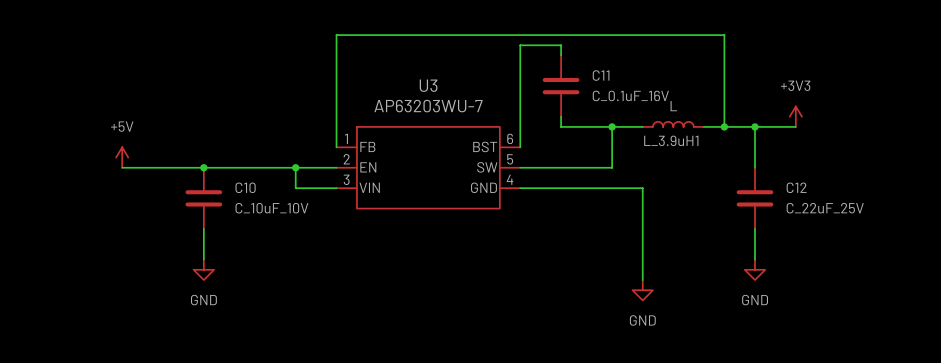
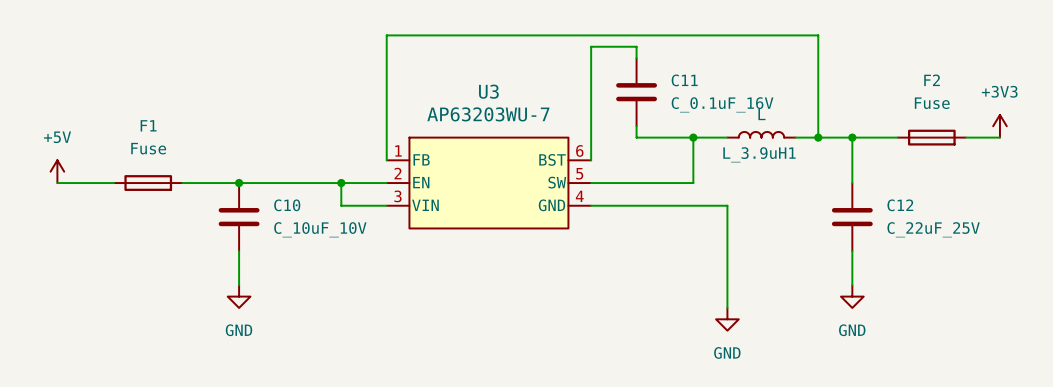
power symbol position: +3V3 (795, 116) -> +3V3 (999, 126)
F2: none -> Fuse (931, 137)
wire: none -> (965, 137) (999, 137)
power symbol position: +5V (122, 157) -> +5V (57, 171)
wire: none -> (57, 183) (114, 183)
F1: none -> Fuse (148, 183)

